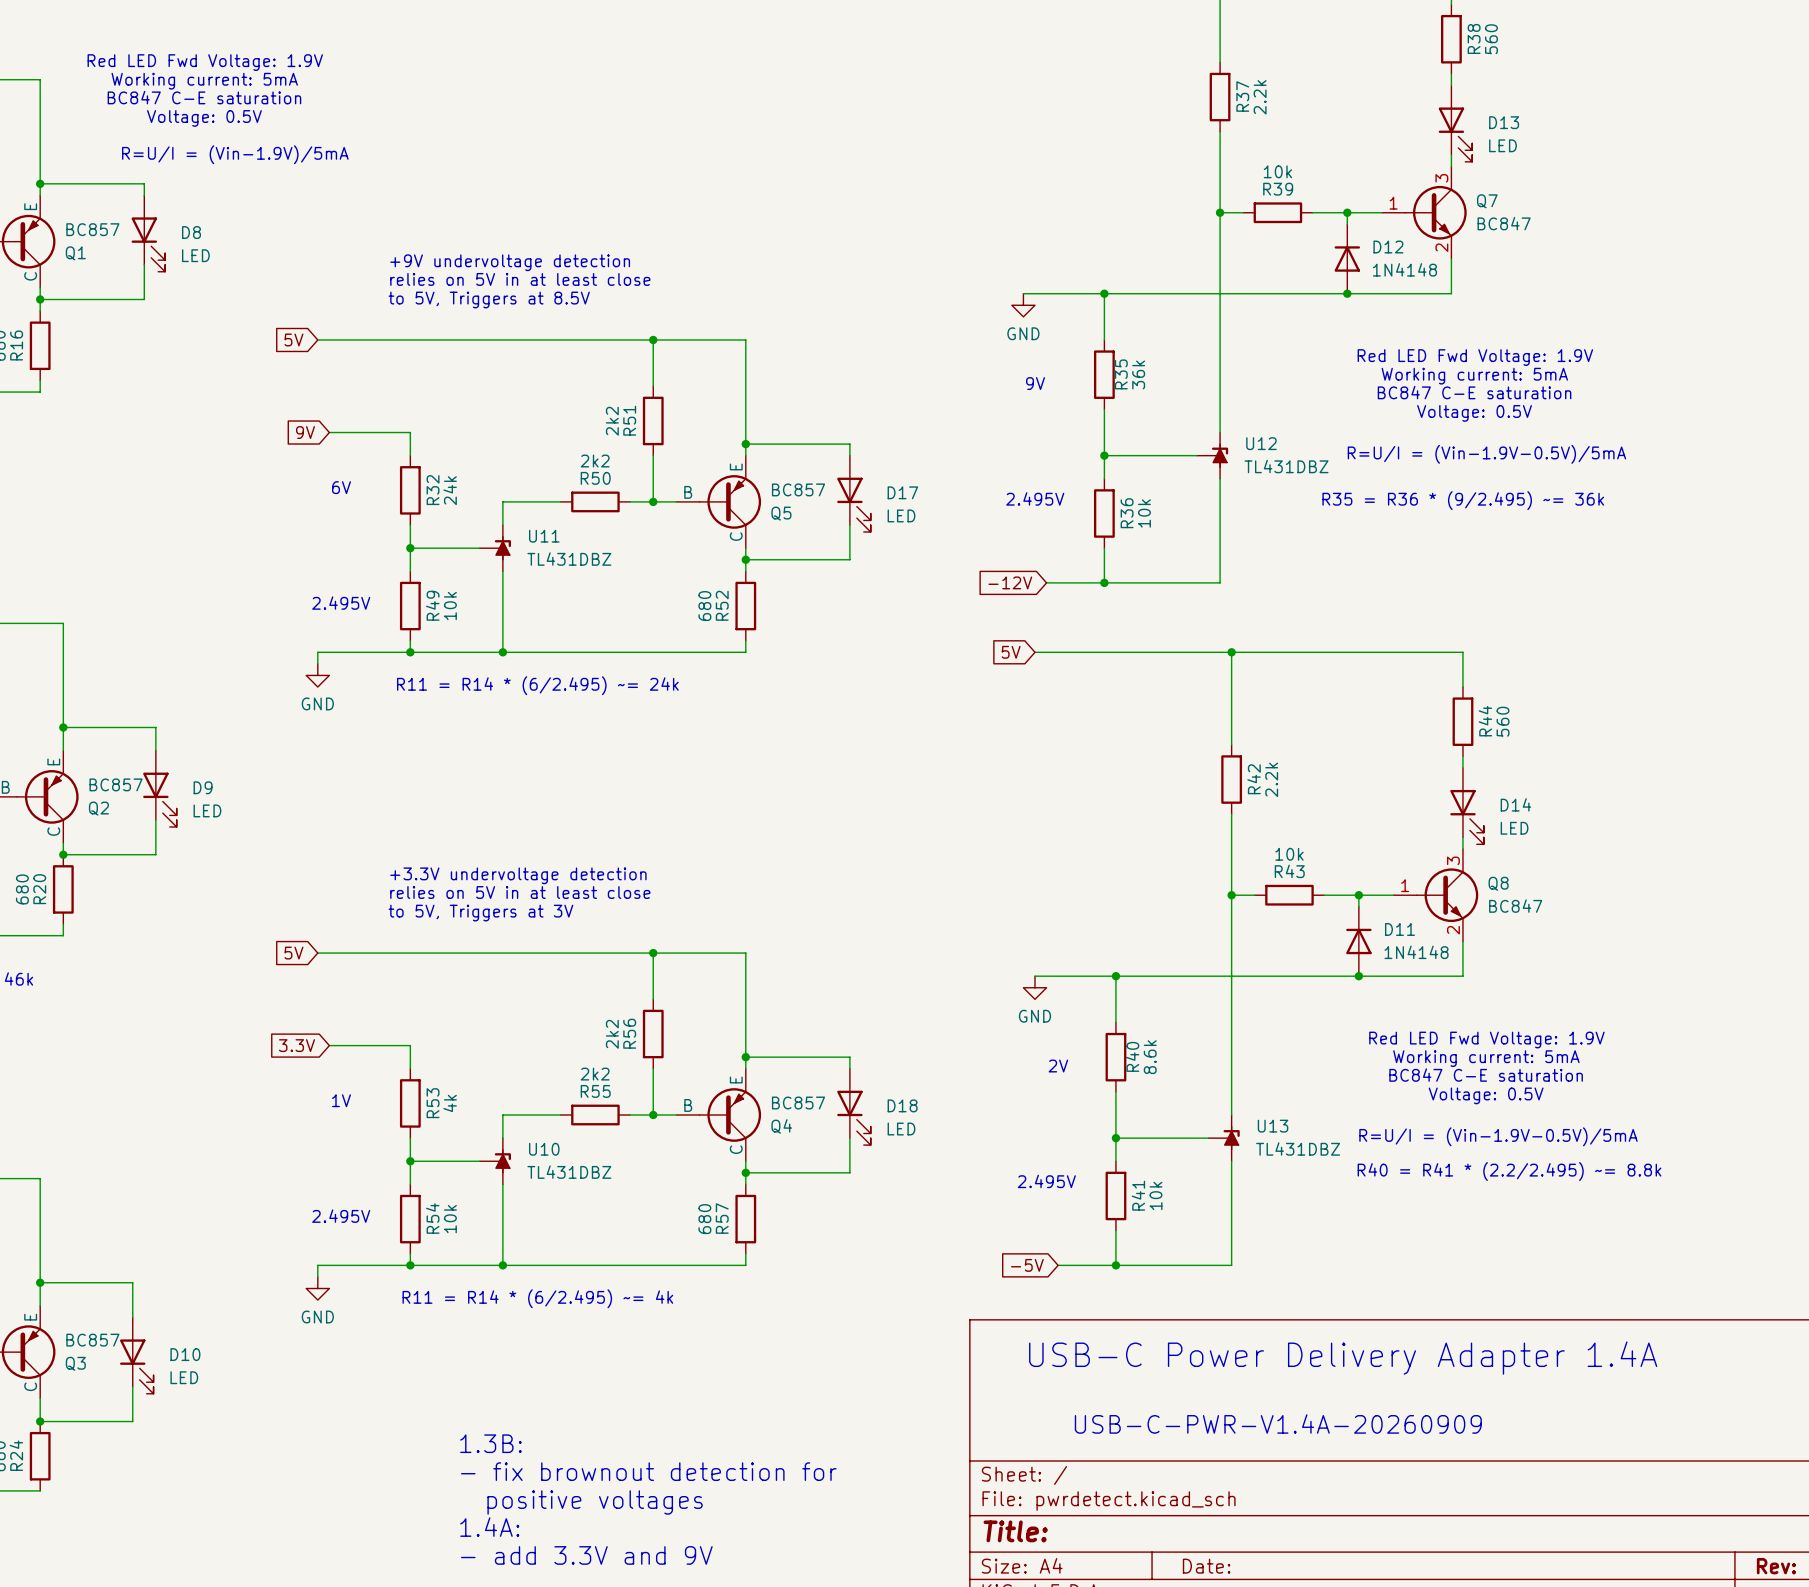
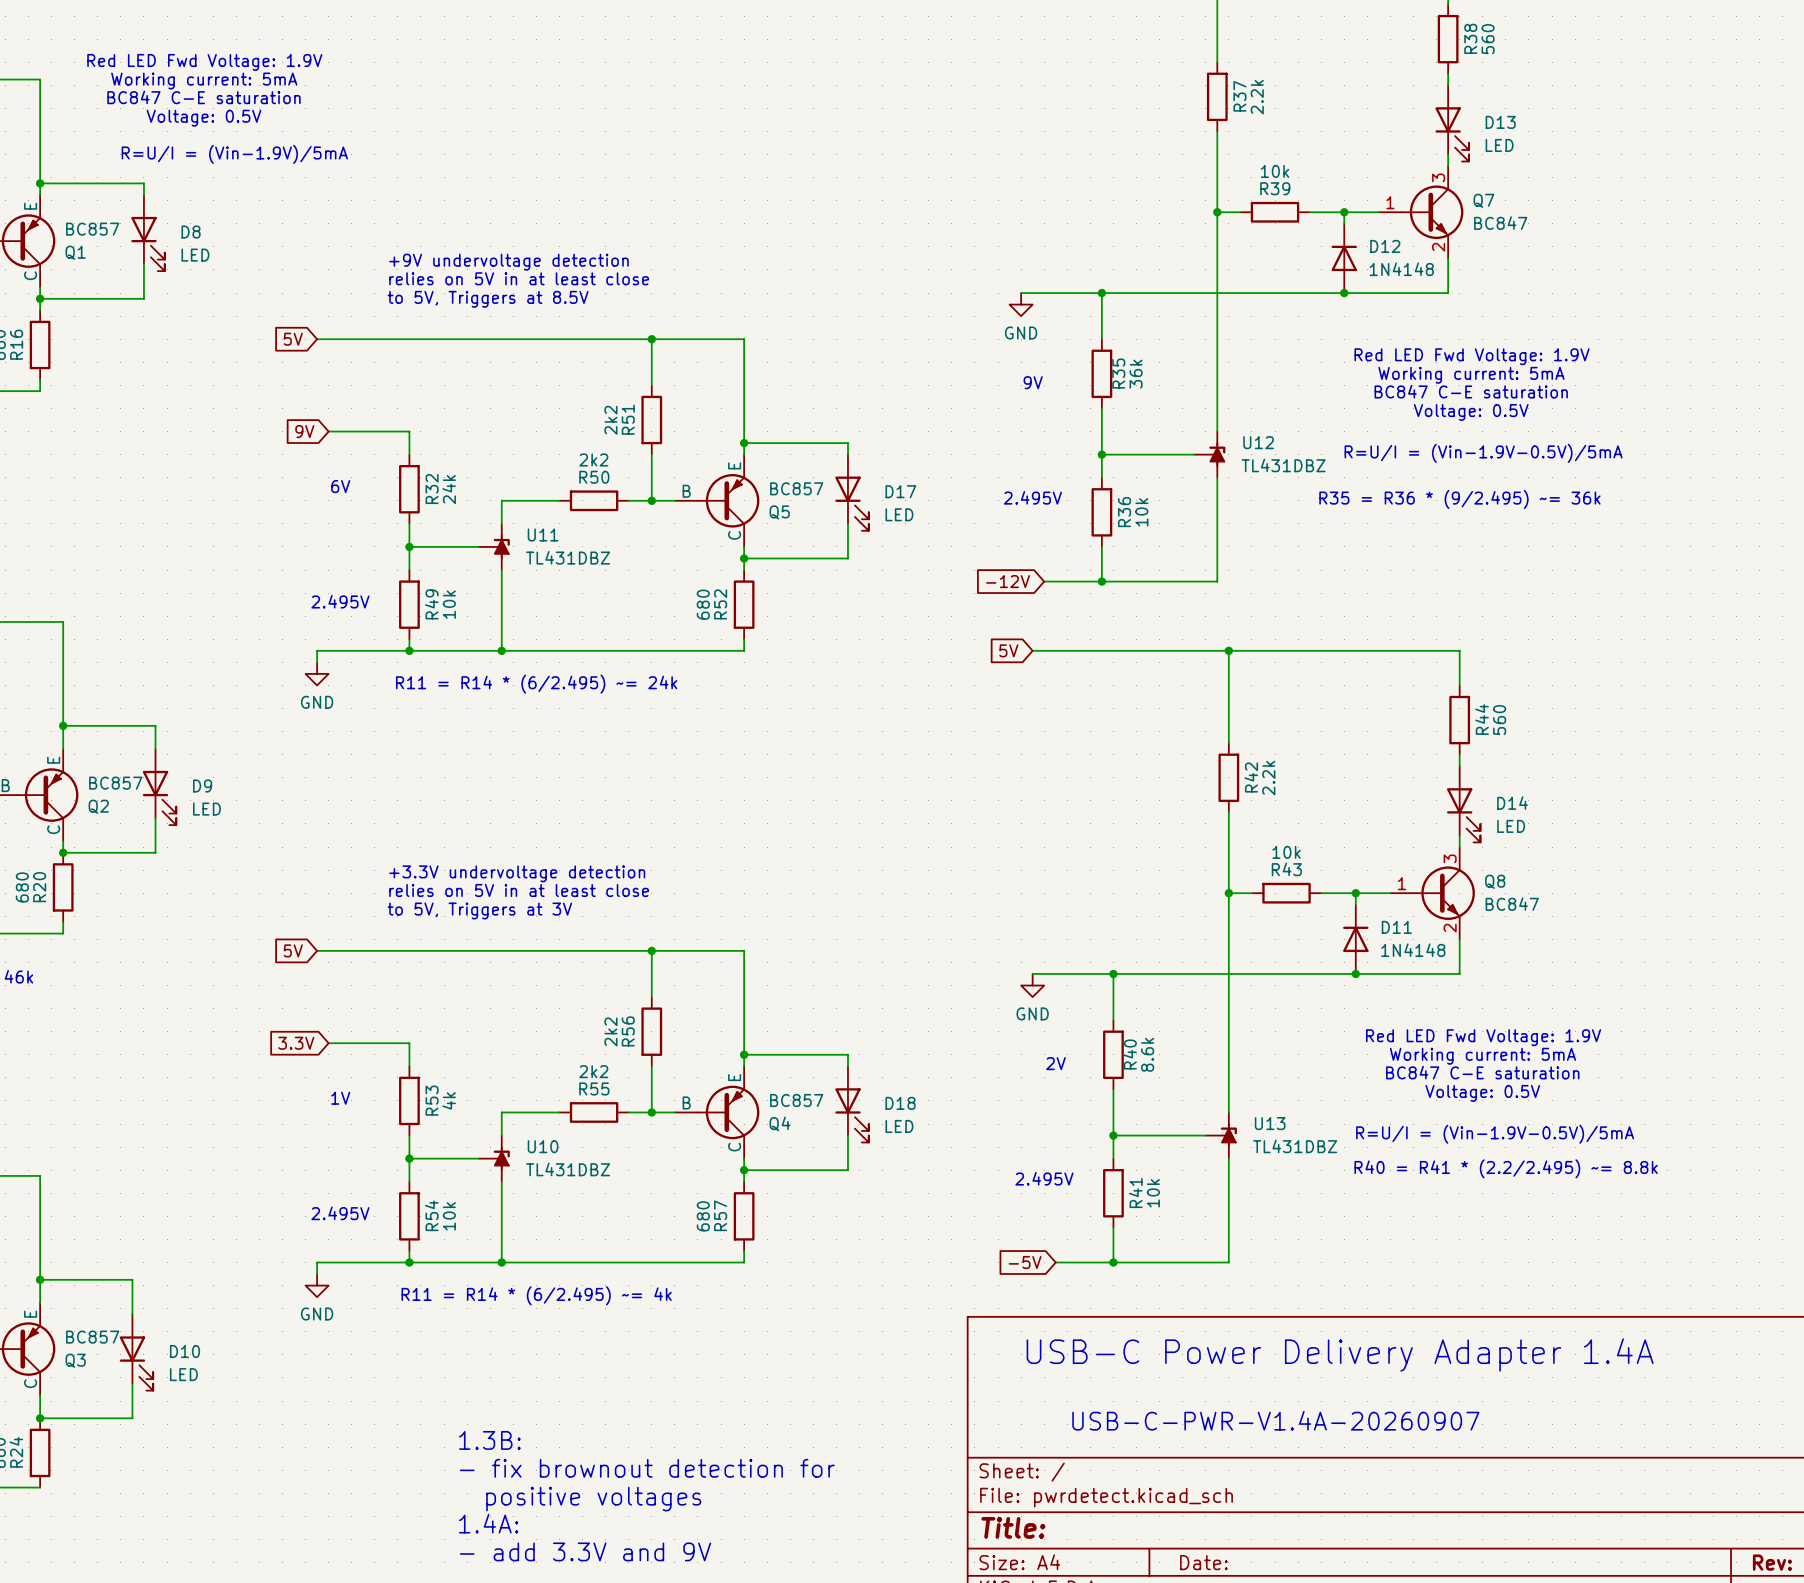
text: USB-C-PWR-V1.4A-20260909 (1278, 1423) -> USB-C-PWR-V1.4A-20260907 (1275, 1420)

